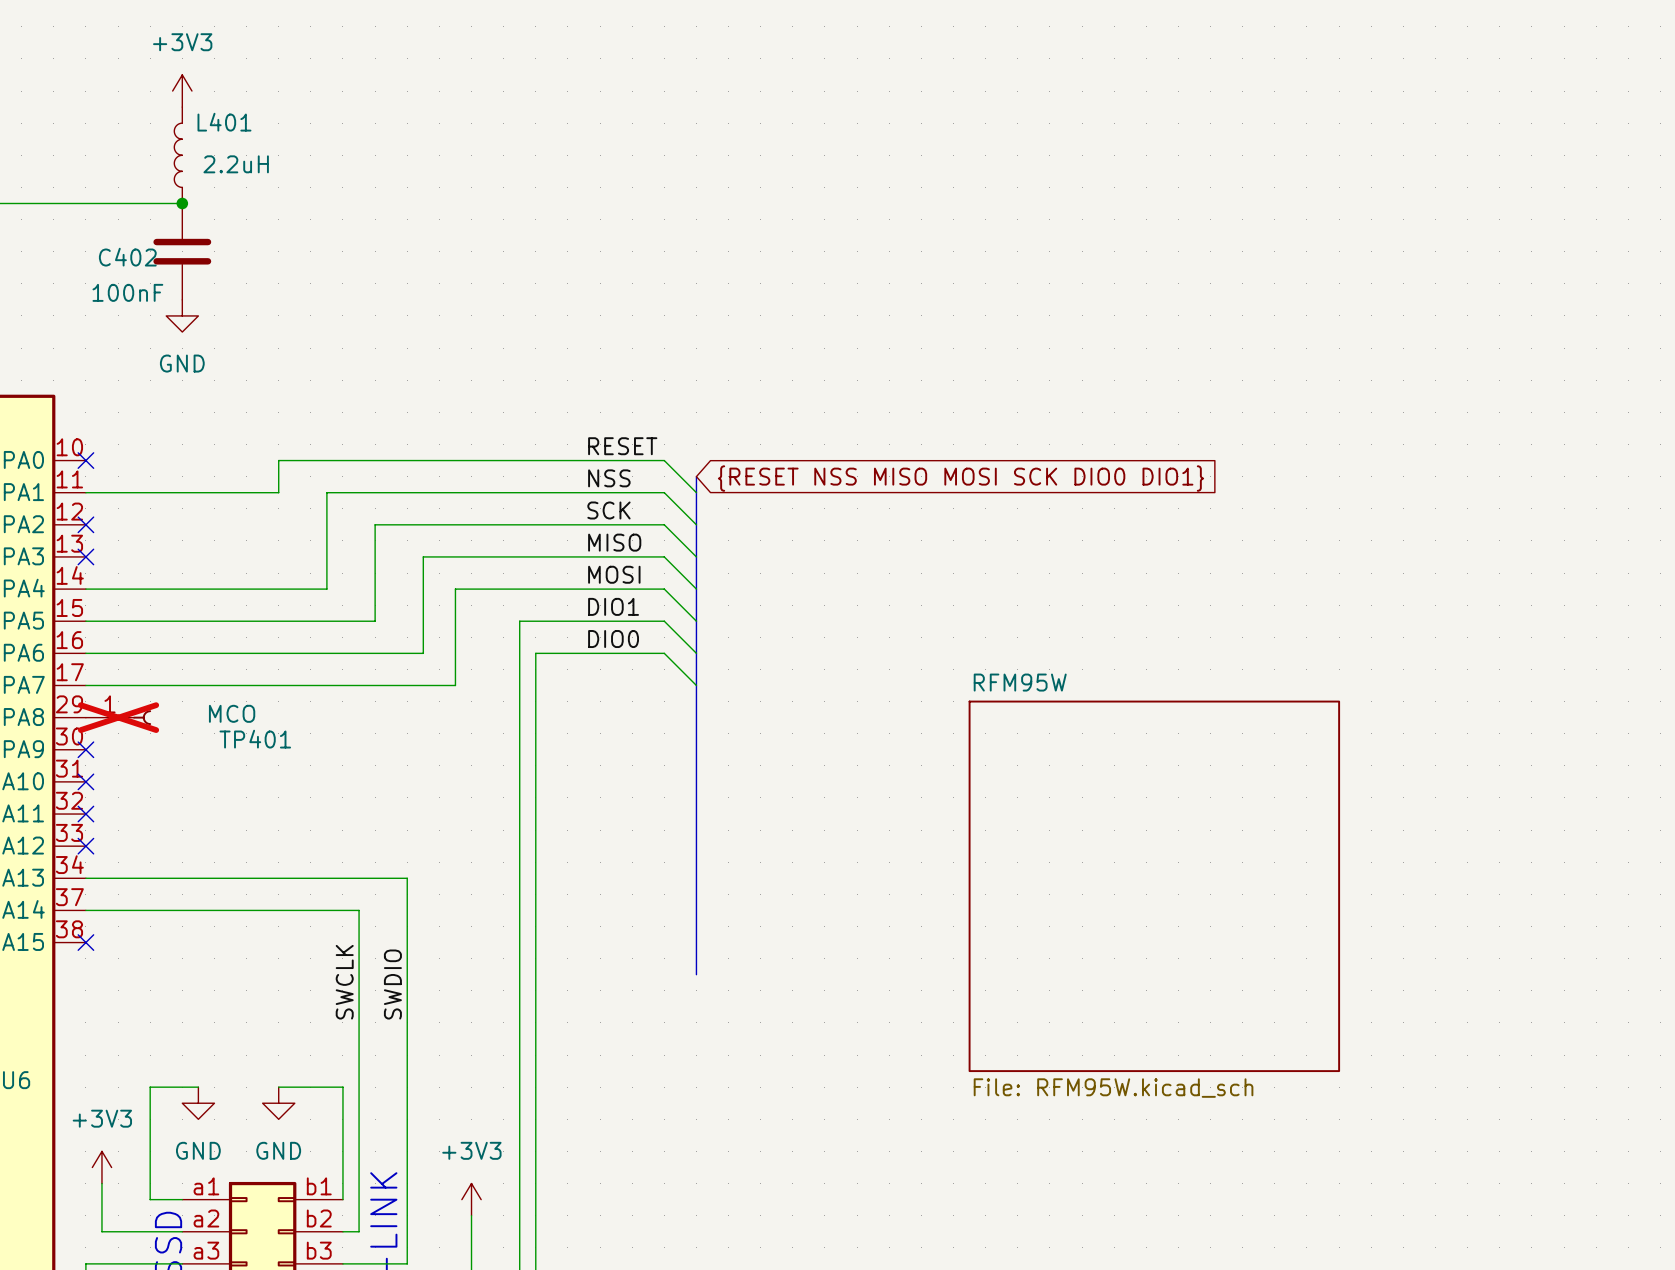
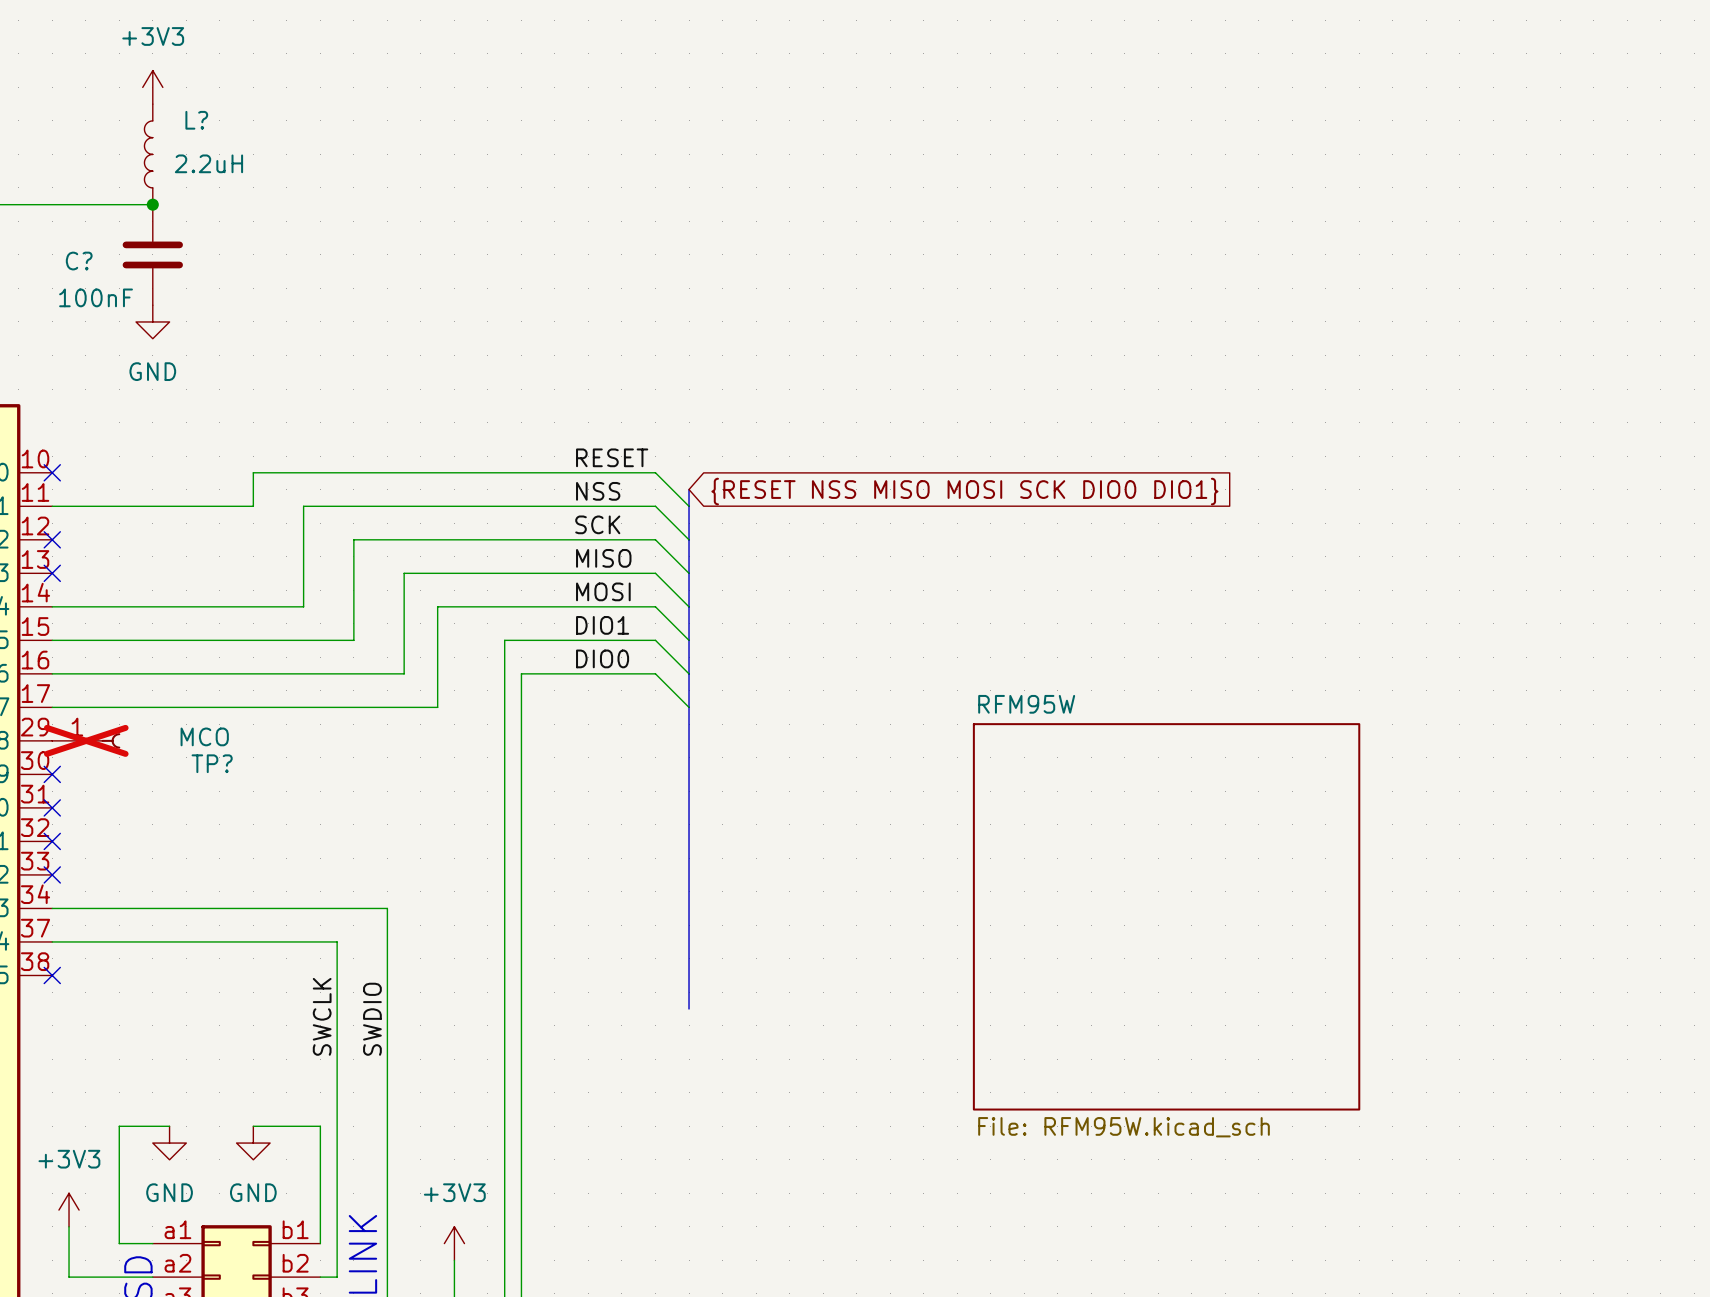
L401 name: L401 (224, 122) -> L? (196, 120)
C402 name: C402 (127, 257) -> C? (79, 261)
TP401 name: TP401 (255, 739) -> TP? (212, 763)

